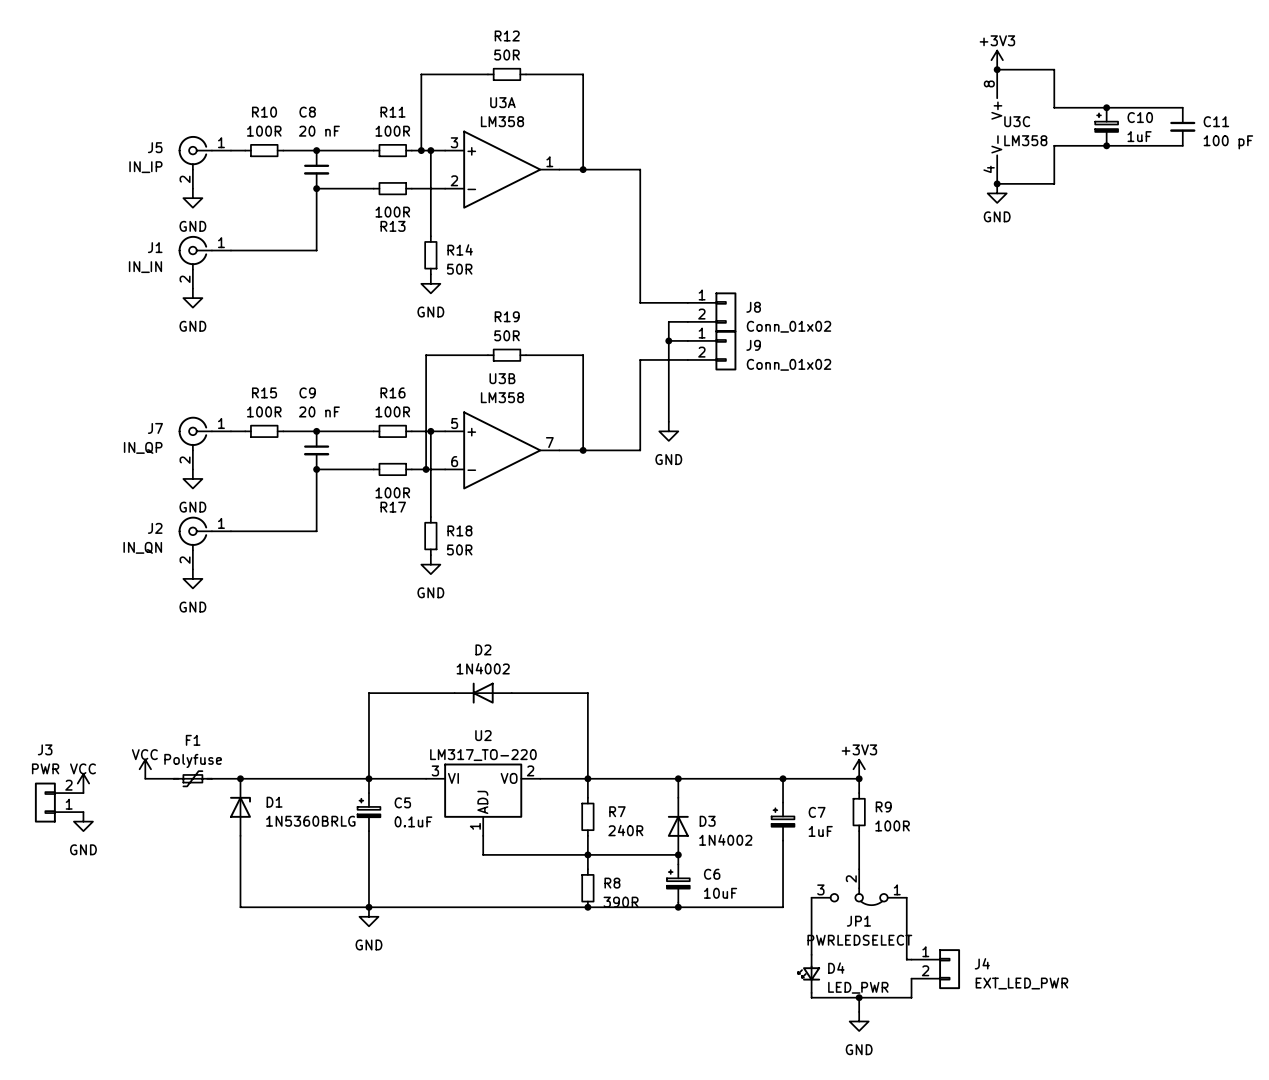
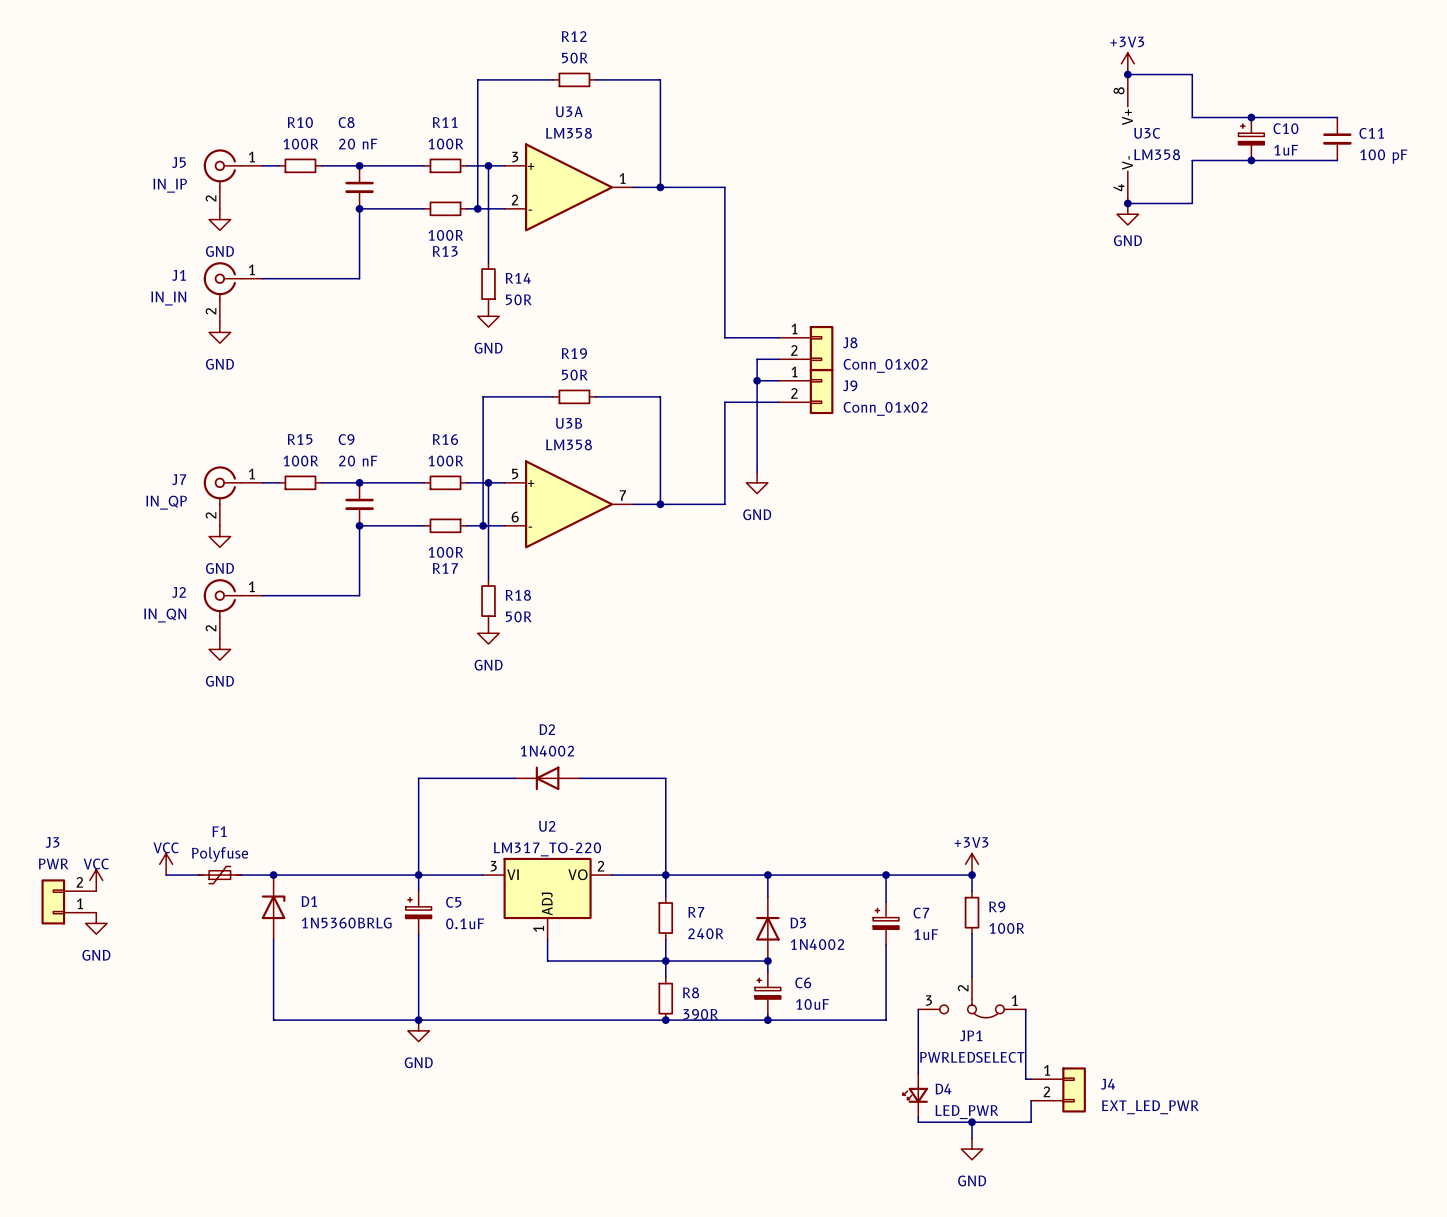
wire: none -> (477, 165) (477, 208)
junction position: (421, 150) -> (477, 208)

